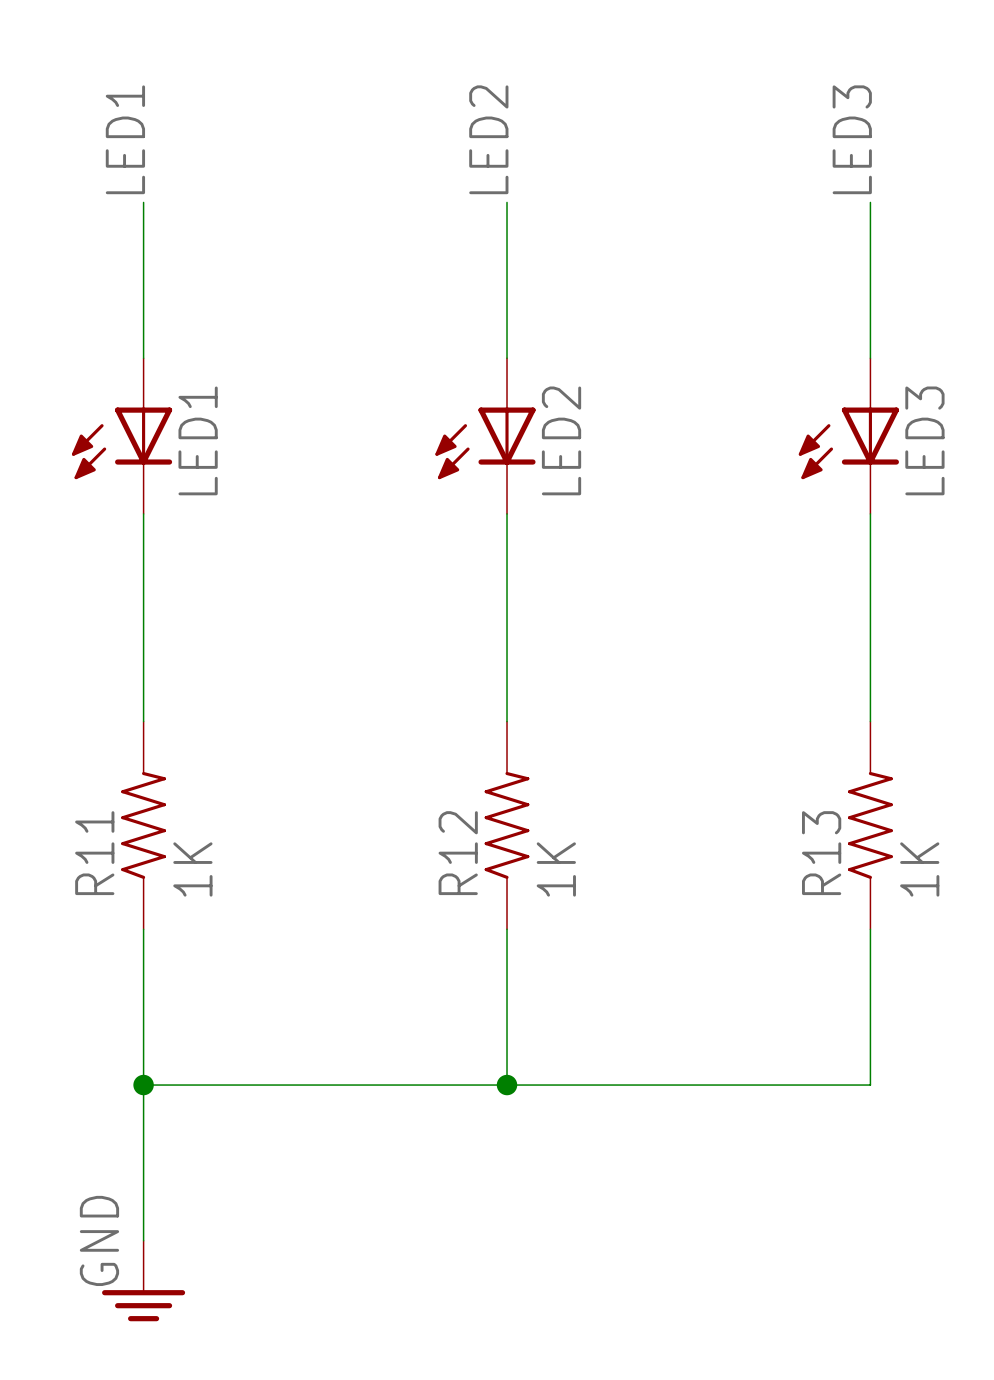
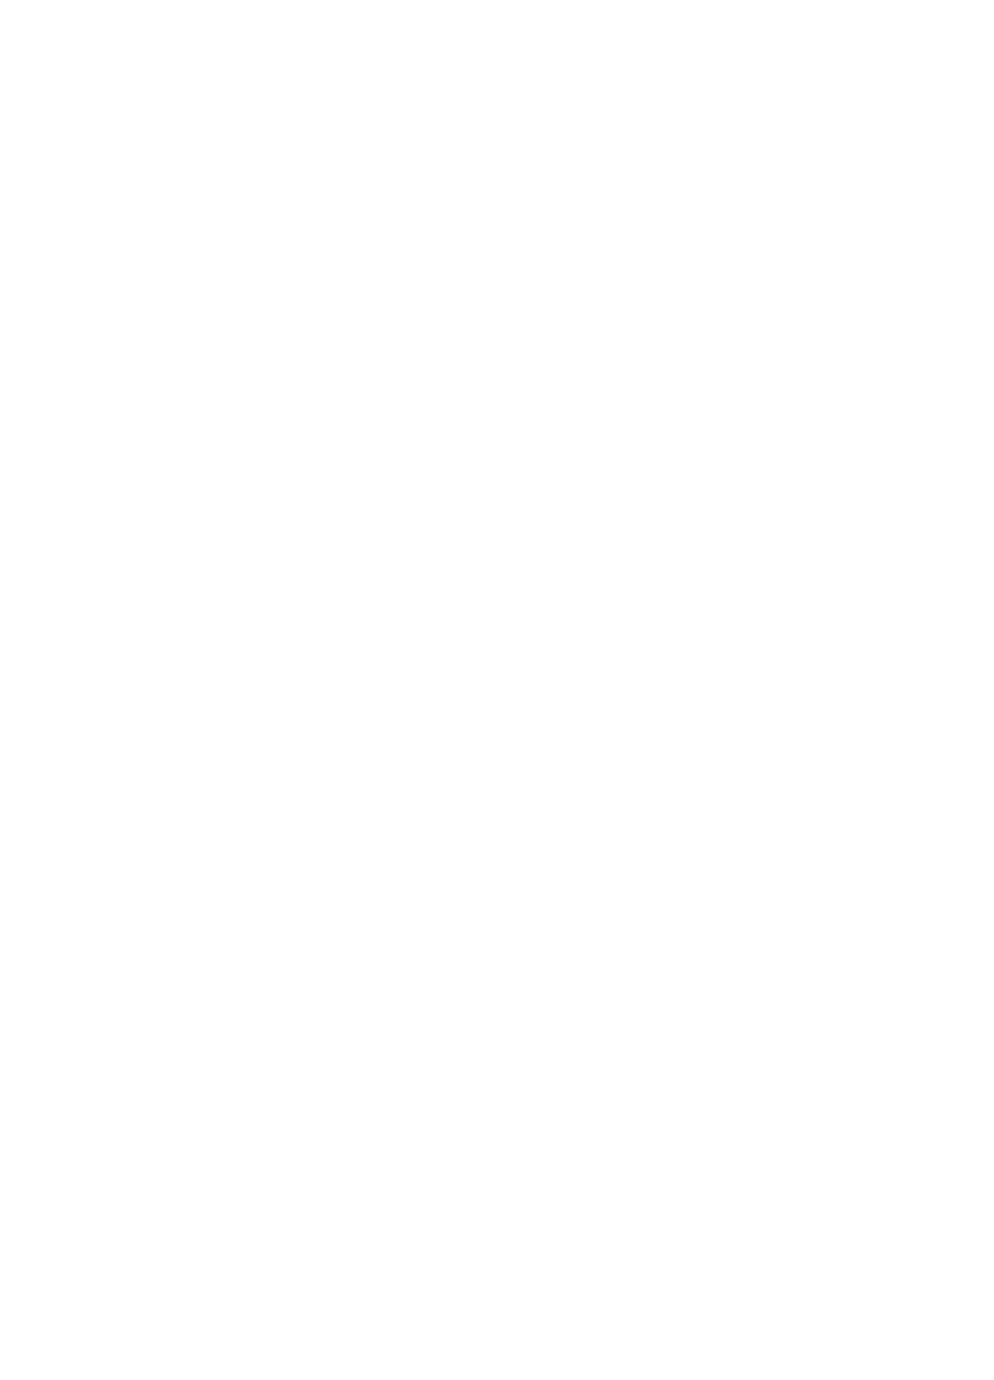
label: LED1 (125, 139) -> none
label: LED2 (488, 139) -> none
label: LED3 (852, 139) -> none
wire: (143, 202) (143, 358) -> none
wire: (507, 202) (507, 358) -> none
wire: (870, 202) (870, 358) -> none
LED1: (122, 436) -> none
LED2: (485, 436) -> none
LED3: (848, 436) -> none
wire: (143, 513) (143, 721) -> none
wire: (507, 513) (507, 721) -> none
wire: (870, 513) (870, 721) -> none
R11: 1K (143, 825) -> none
R12: 1K (507, 825) -> none
R13: 1K (870, 825) -> none
wire: (143, 929) (143, 1240) -> none
wire: (507, 929) (507, 1085) -> none
wire: (870, 929) (870, 1085) (143, 1085) -> none
junction: (143, 1085) -> none
junction: (507, 1085) -> none
power symbol: GND (143, 1281) -> none

